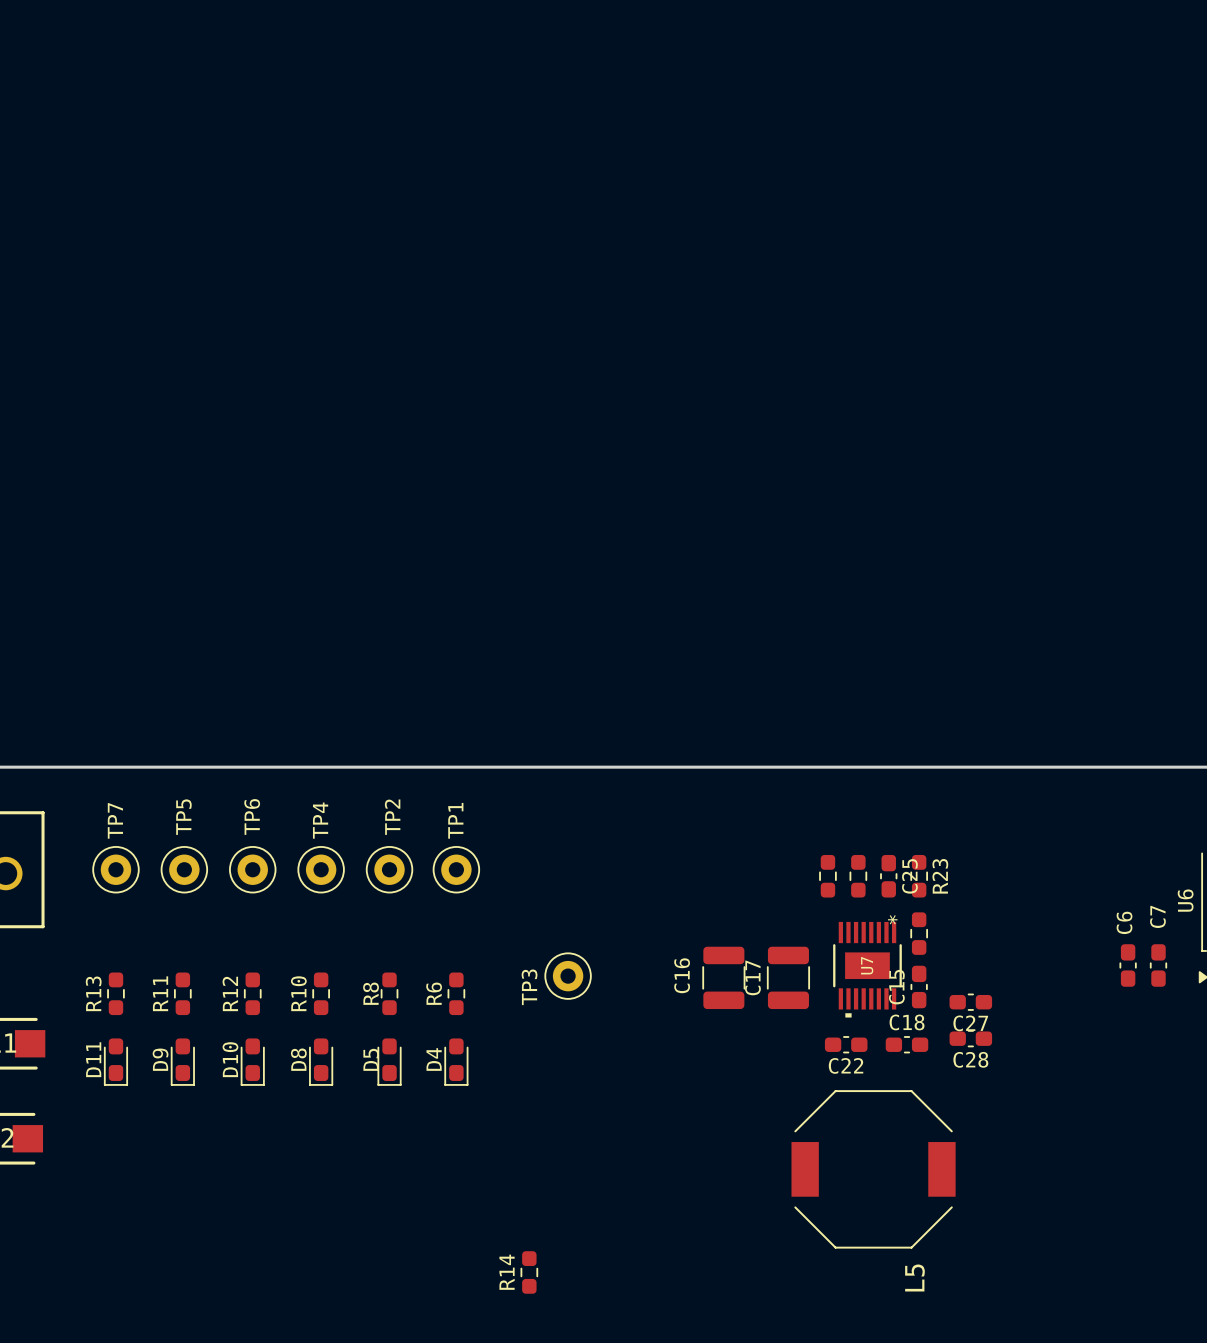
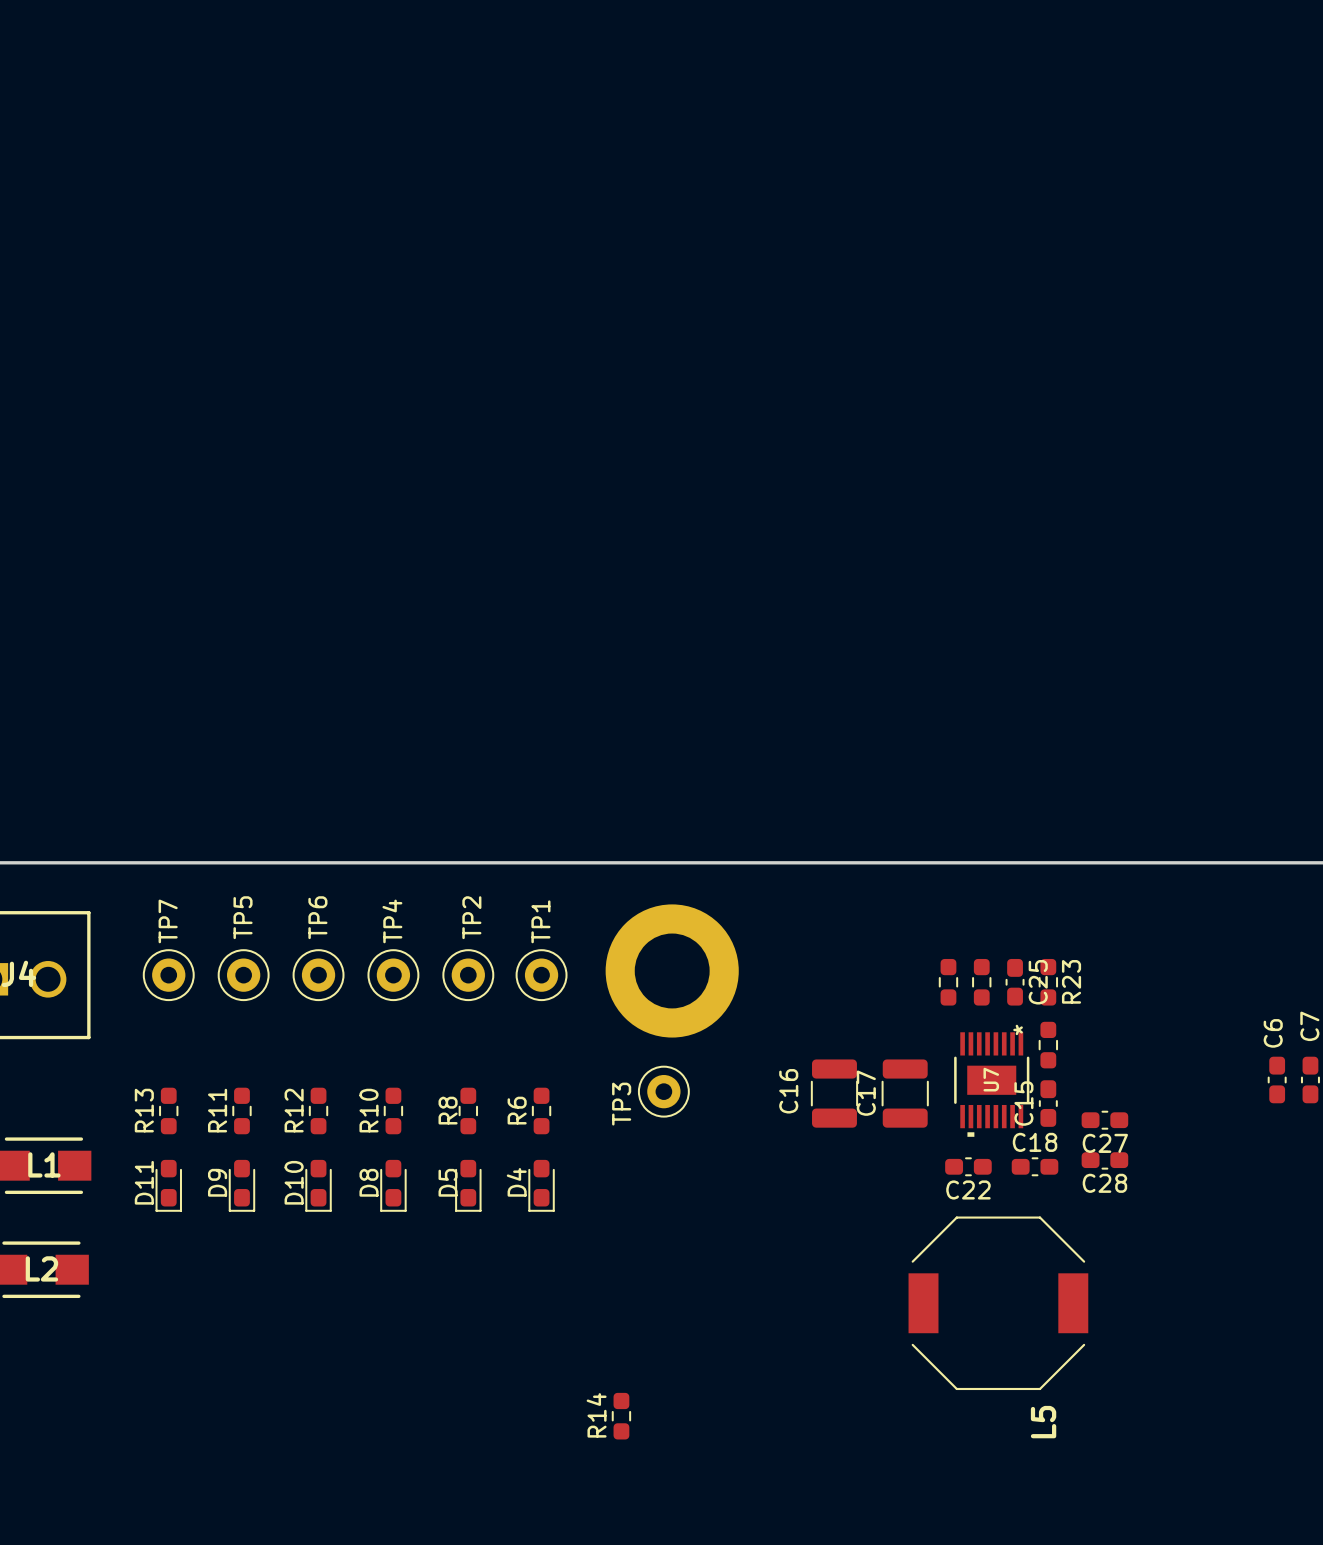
part: none -> (672, 970)

